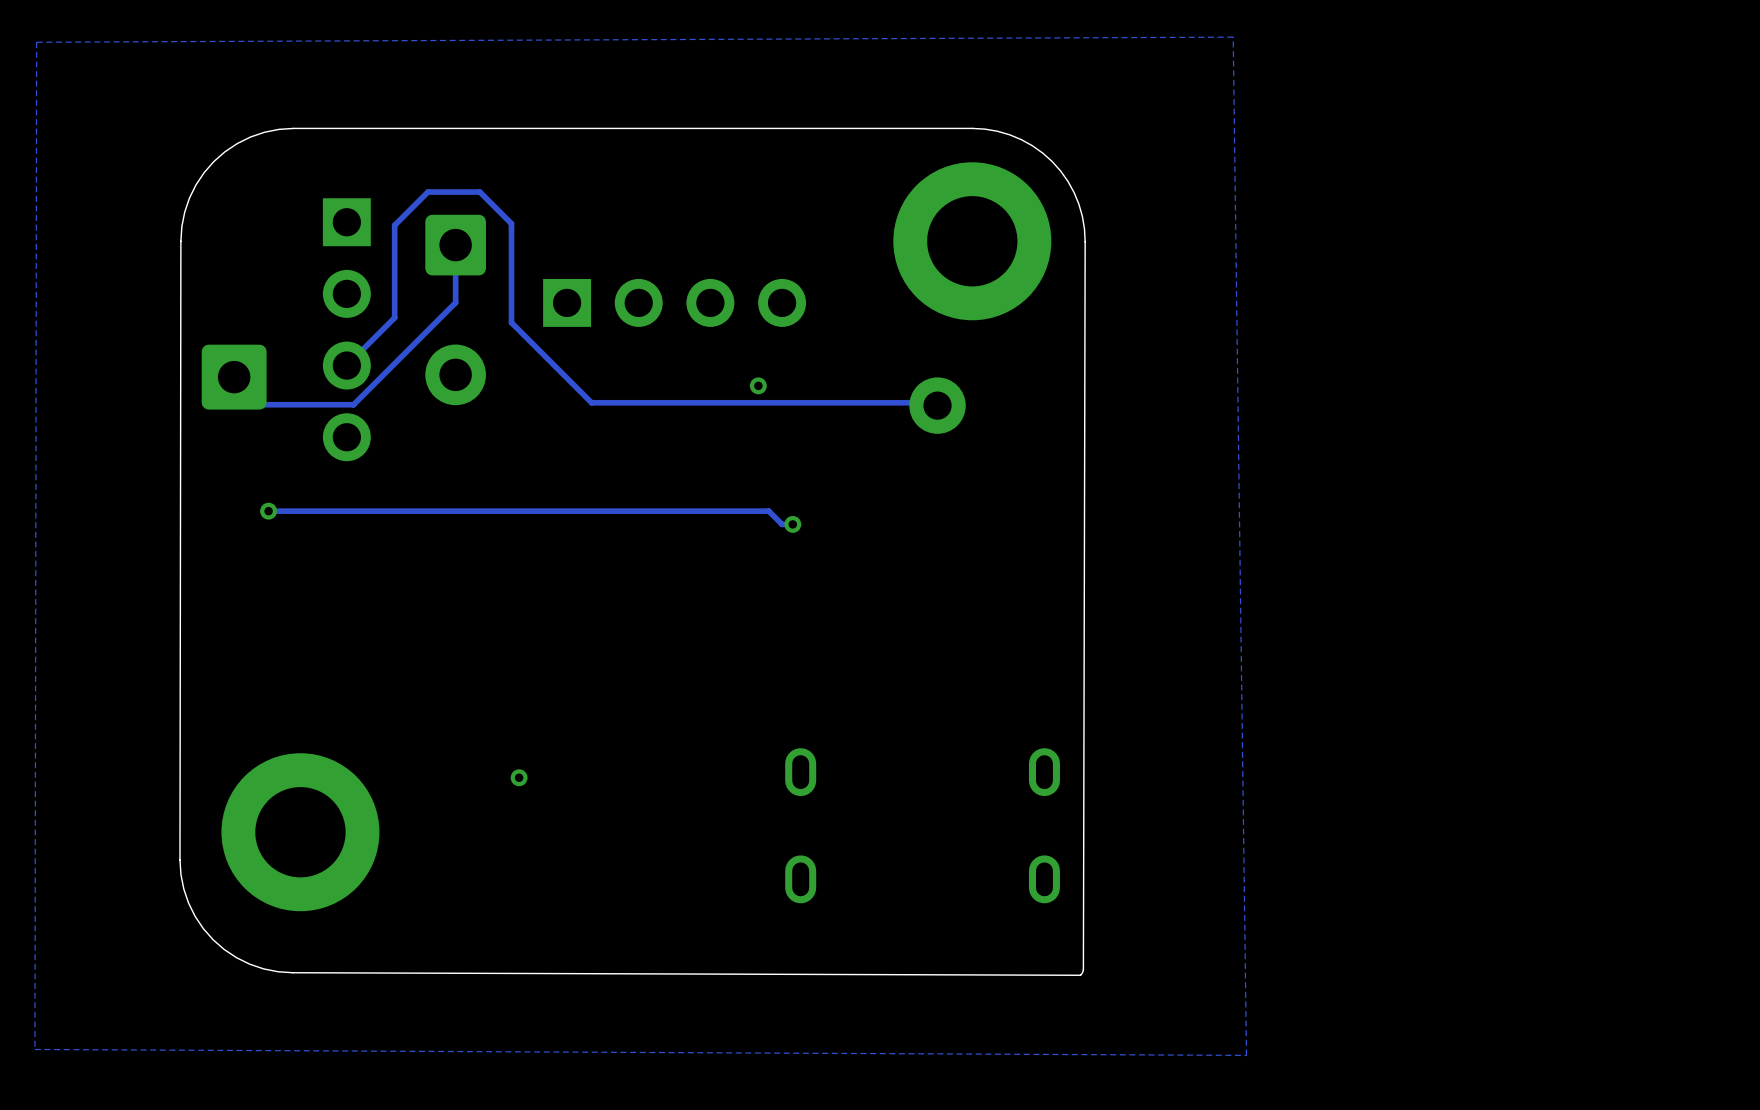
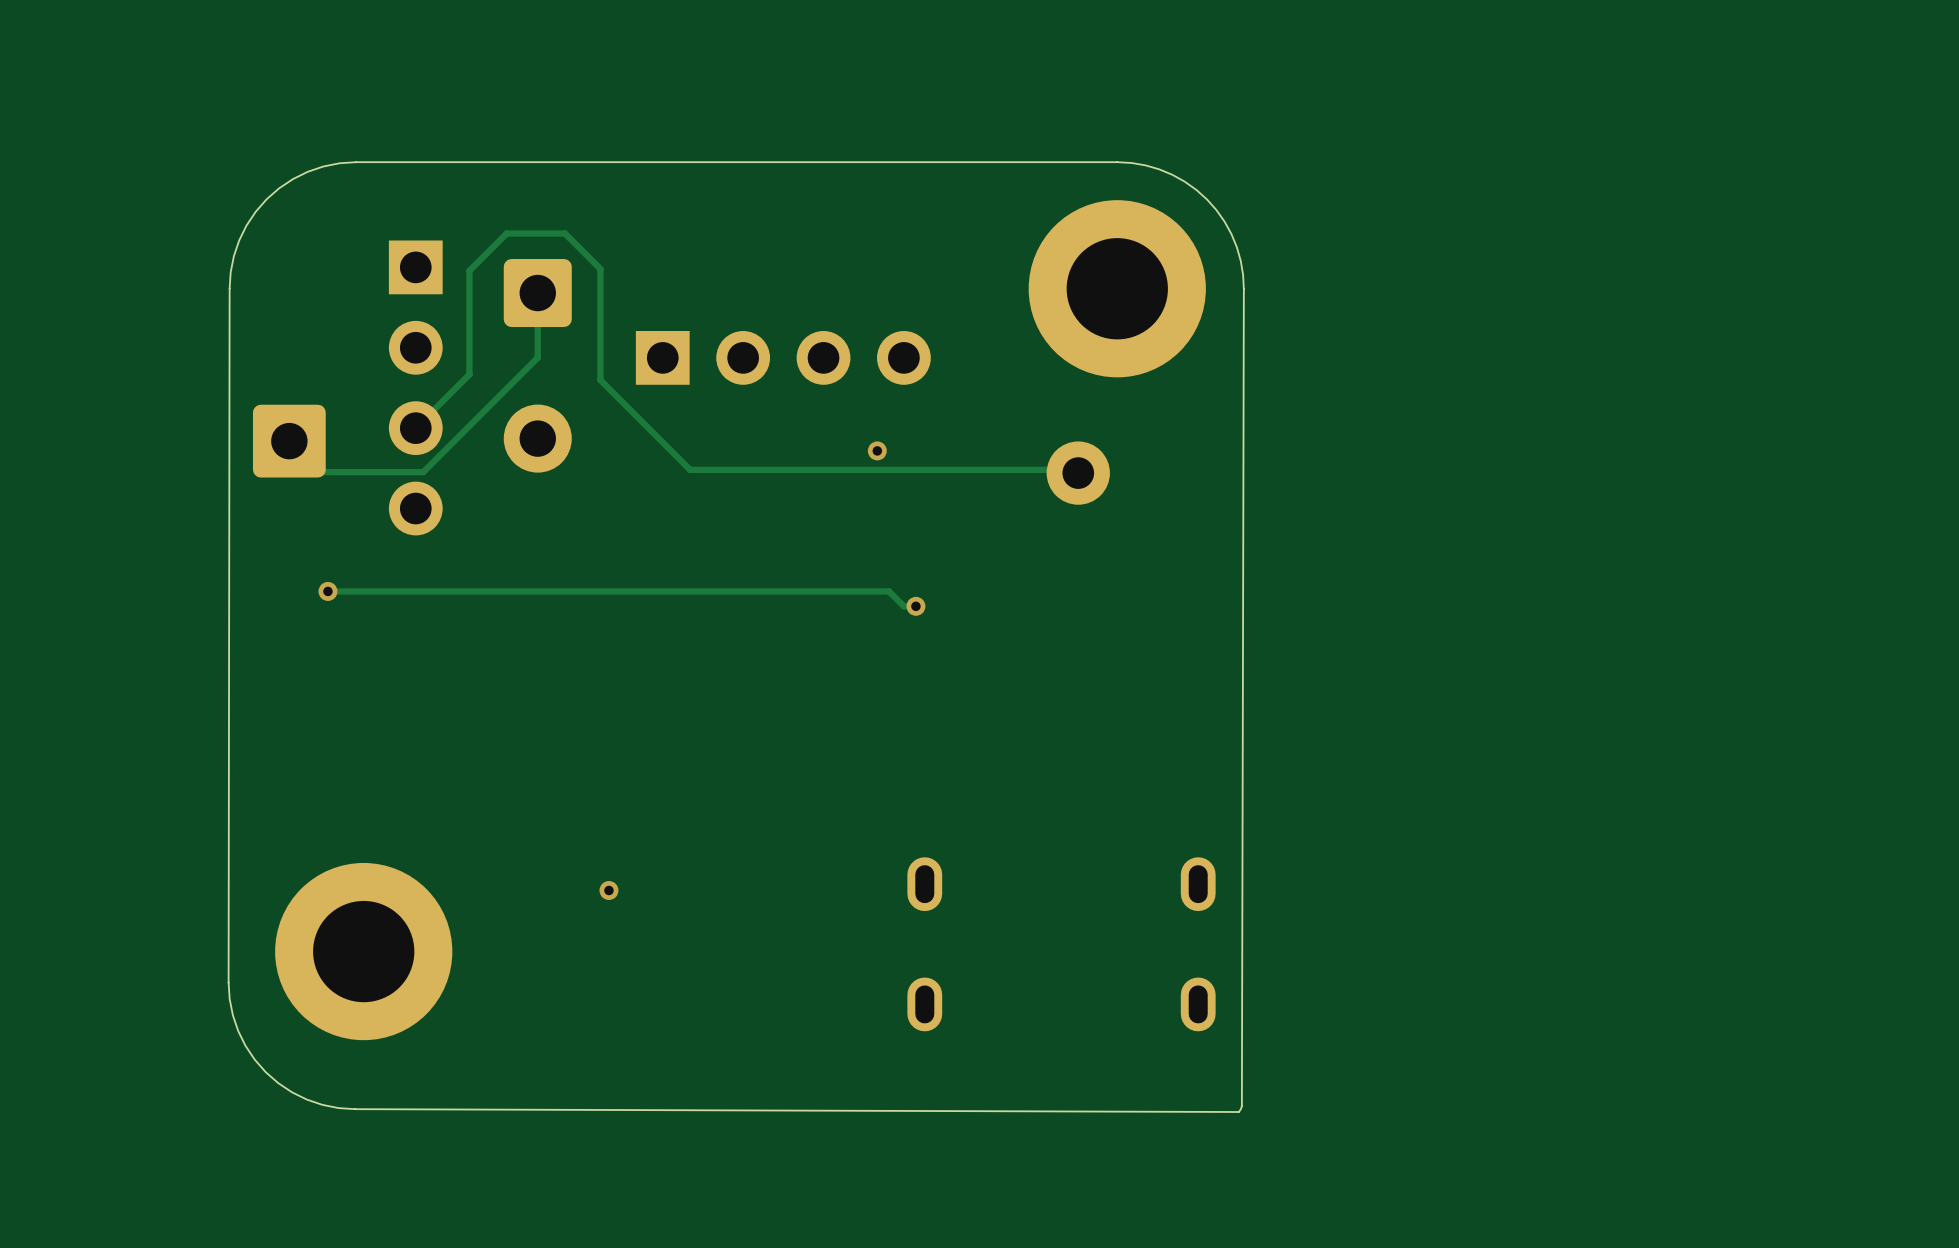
zone outline: (1233, 37) (36, 42) (34, 1049) (1246, 1055) (1233, 37) -> none

